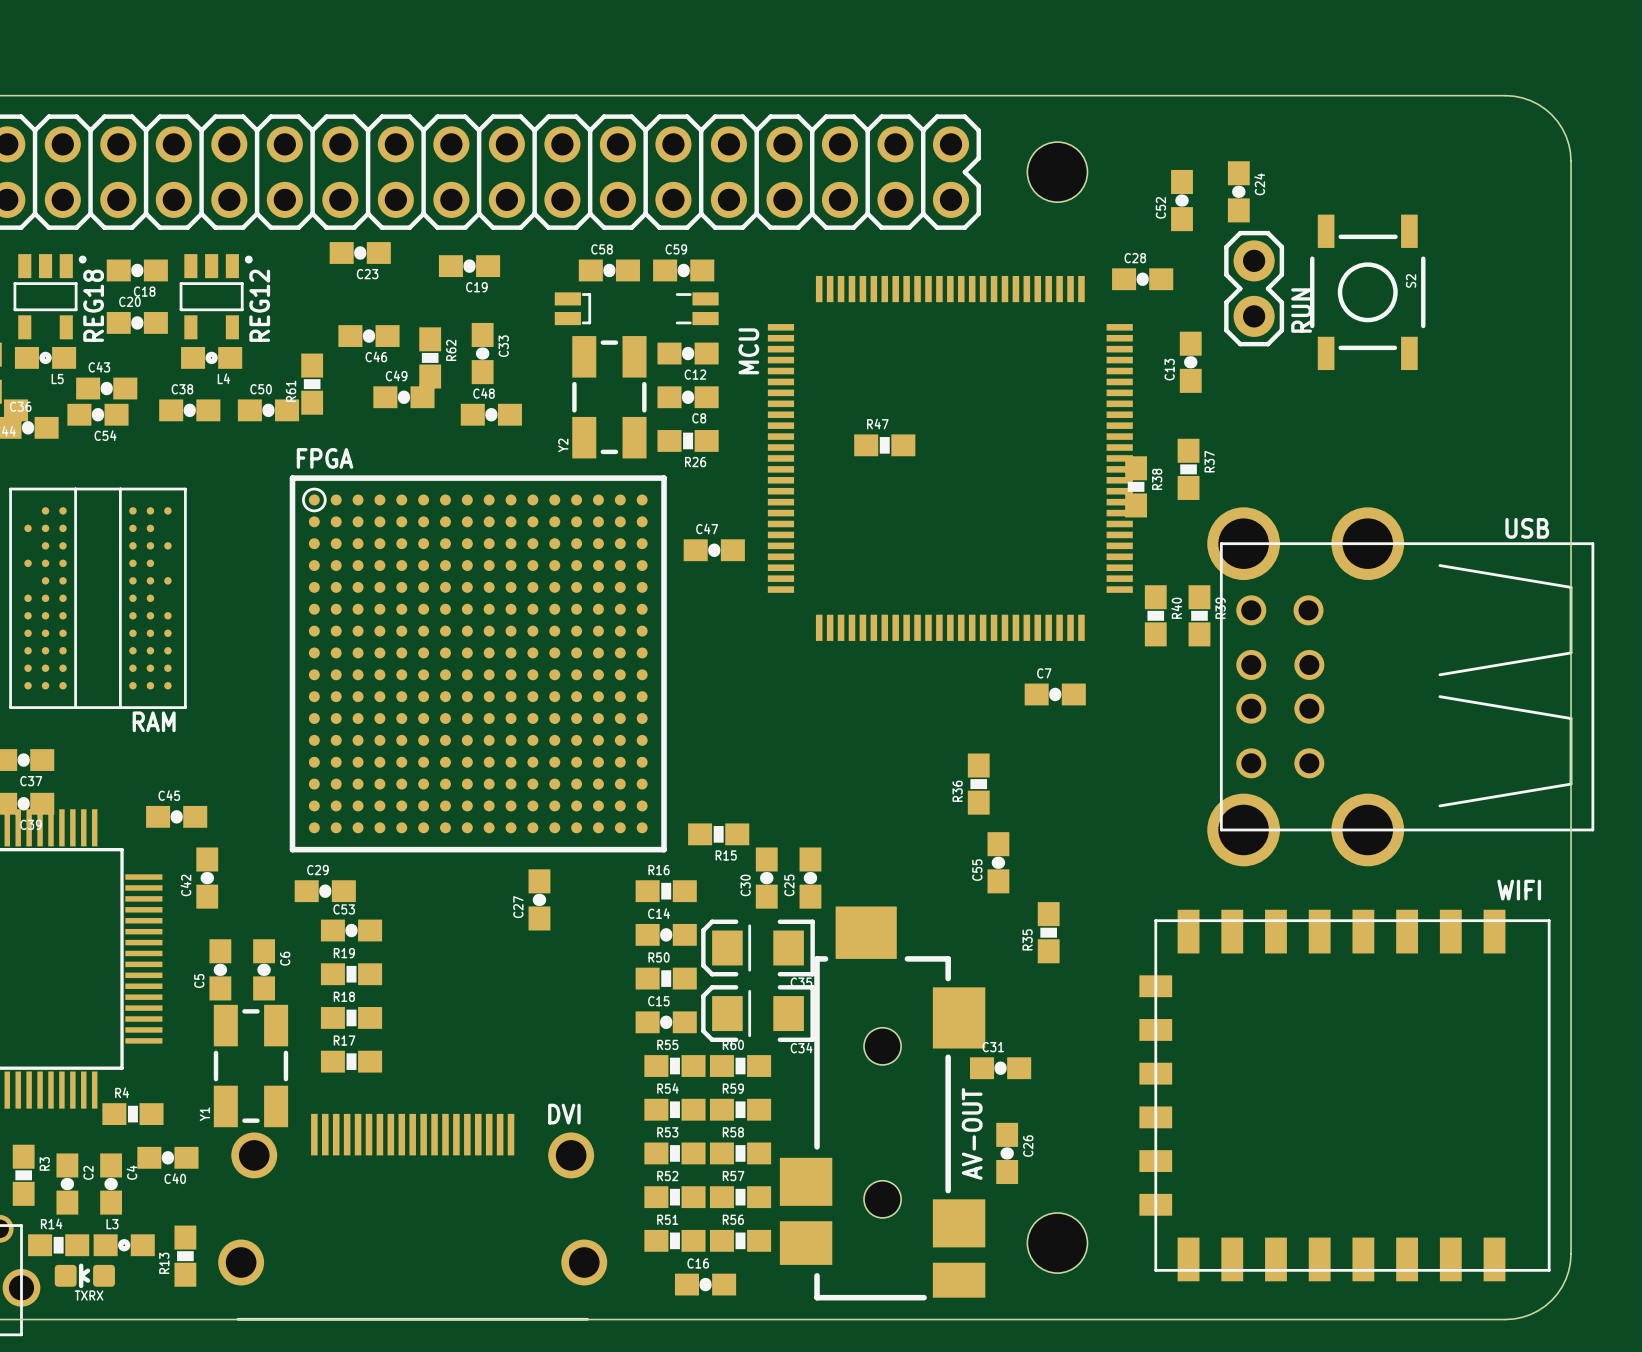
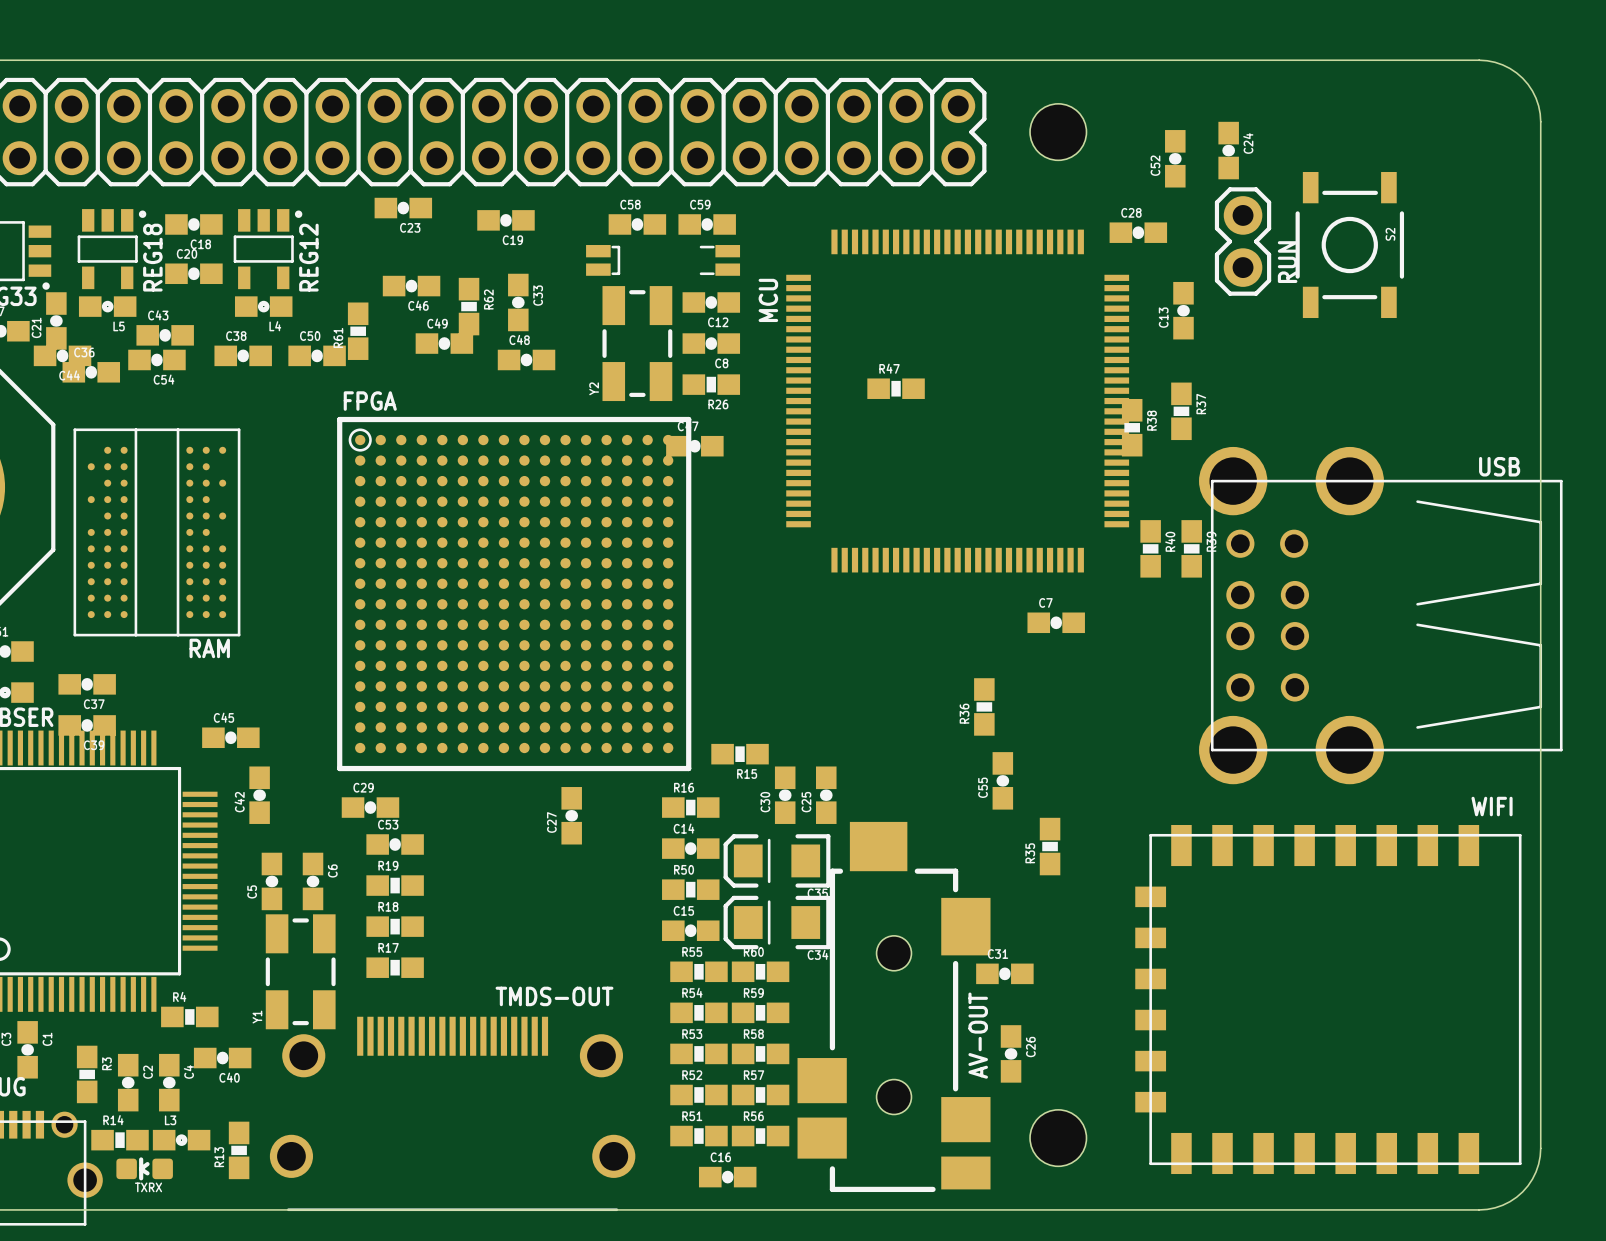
C47 position: (714, 550) -> (694, 446)
DVI name: DVI (564, 1114) -> TMDS-OUT (554, 996)

